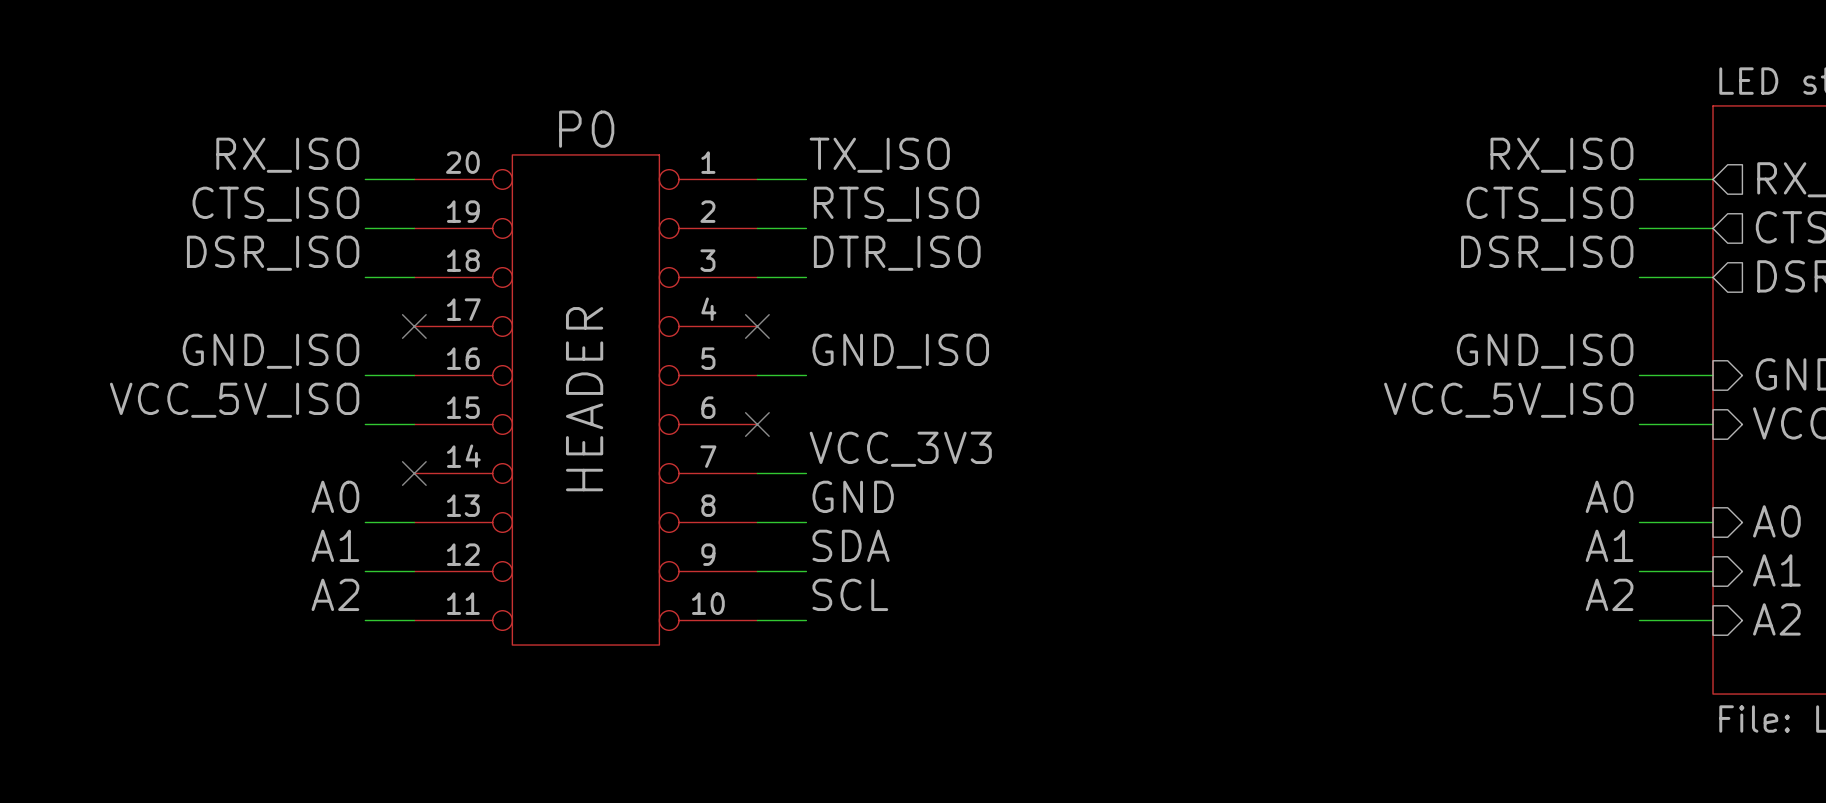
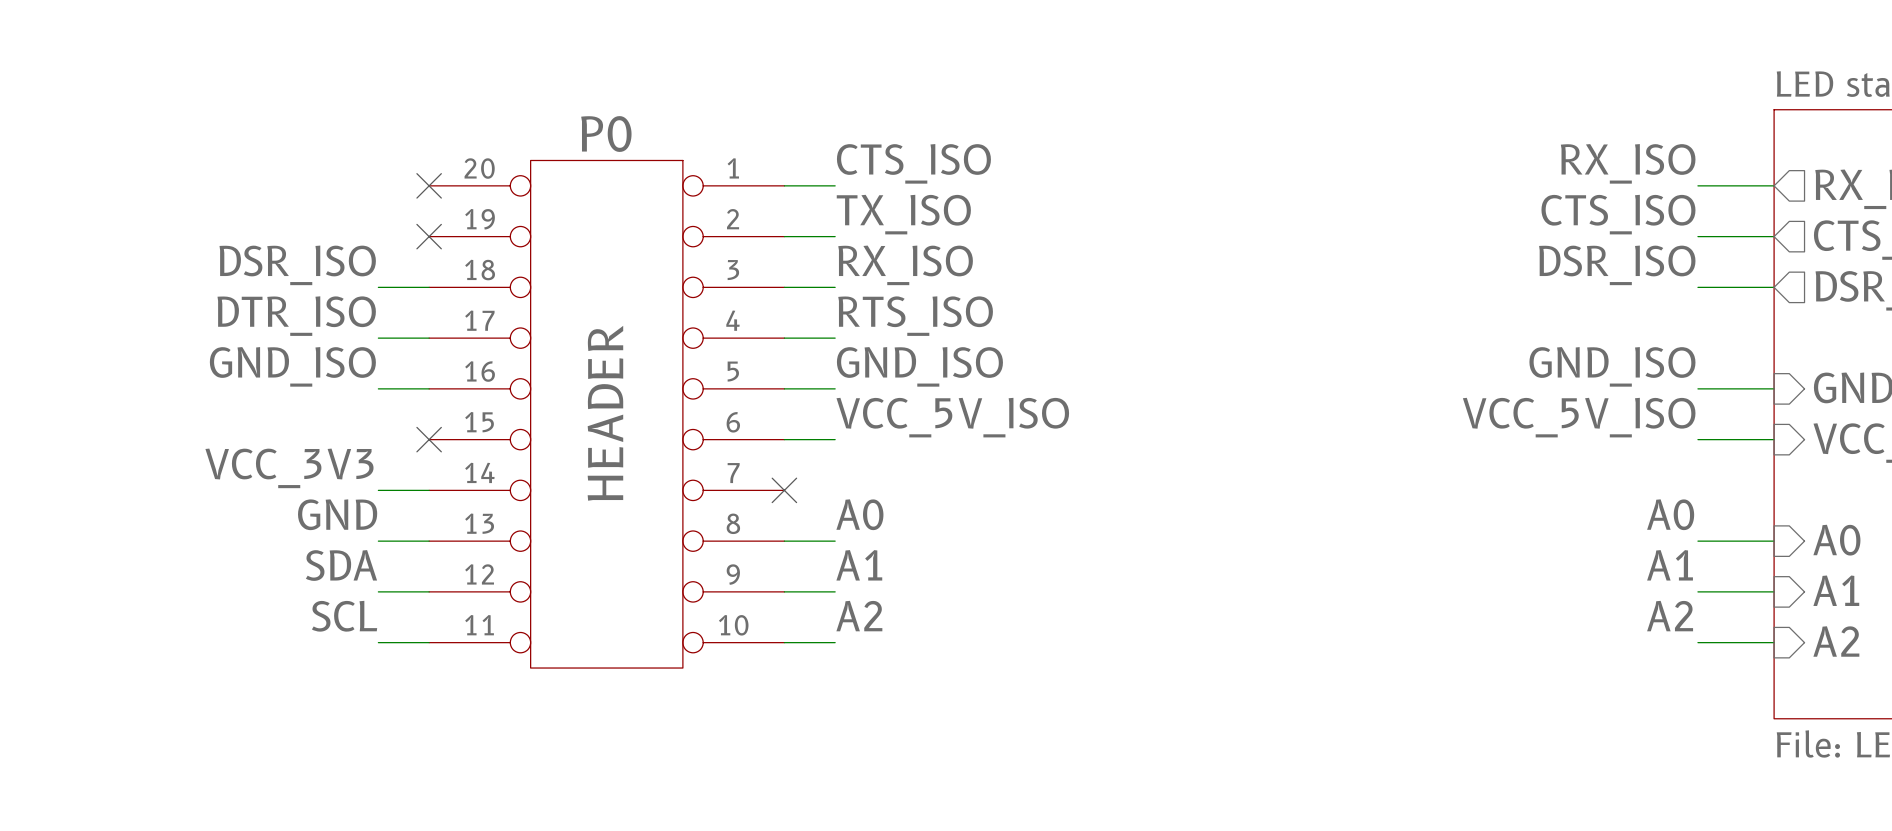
label: RX_ISO (287, 155) -> none
label: TX_ISO (879, 155) -> CTS_ISO (913, 163)
wire: (365, 179) (414, 179) -> (784, 338) (835, 338)
no-connect mark: none -> (429, 185)
label: CTS_ISO (275, 204) -> none
label: RTS_ISO (896, 204) -> TX_ISO (903, 214)
wire: (365, 228) (414, 228) -> (378, 338) (429, 338)
no-connect mark: none -> (429, 236)
label: DTR_ISO (897, 253) -> RX_ISO (905, 265)
label: none -> DTR_ISO (296, 316)
label: none -> RTS_ISO (915, 316)
no-connect mark: (414, 326) -> none
no-connect mark: (757, 326) -> none
label position: VCC_5V_ISO (234, 400) -> VCC_5V_ISO (952, 417)
wire: (365, 424) (414, 424) -> (378, 490) (429, 490)
no-connect mark: none -> (429, 439)
no-connect mark position: (757, 424) -> (784, 490)
label position: VCC_3V3 (900, 449) -> VCC_3V3 (289, 468)
no-connect mark: (414, 473) -> none
wire: (757, 473) (806, 473) -> (784, 439) (835, 439)
label: A0 (335, 496) -> GND (337, 514)
label: GND (853, 496) -> A0 (859, 514)
label: A1 (335, 545) -> SDA (341, 565)
label: SDA (851, 545) -> A1 (859, 565)
label: A2 (335, 594) -> SCL (344, 616)
label: SCL (850, 594) -> A2 (859, 616)

